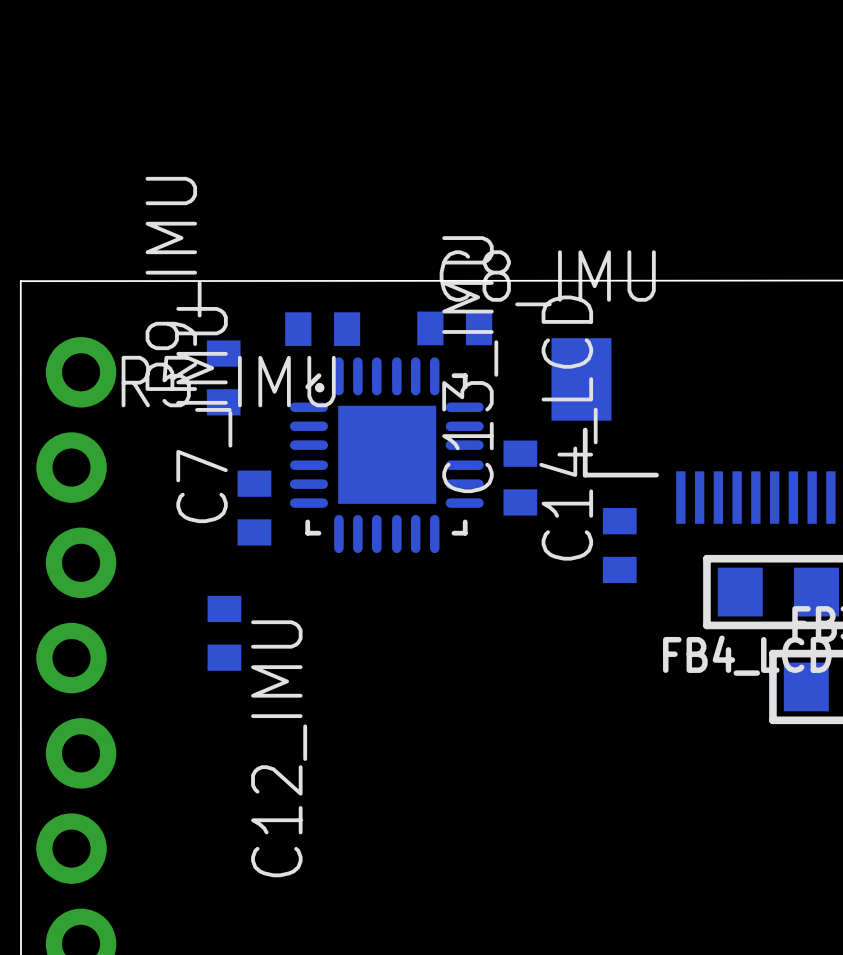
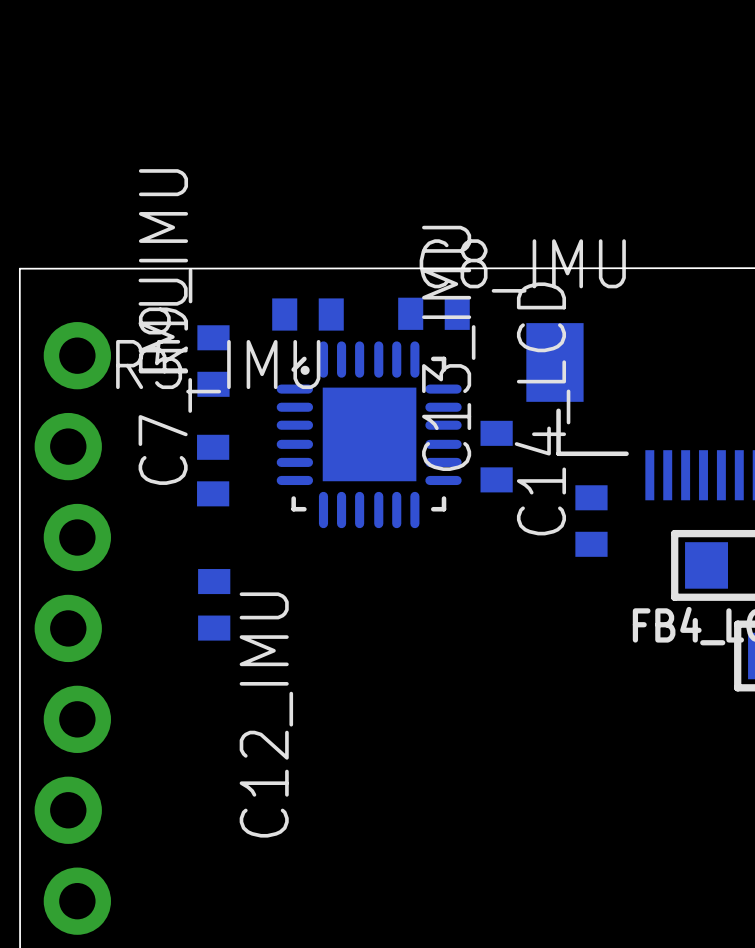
C7_IMU position: (254, 508) -> (213, 470)

